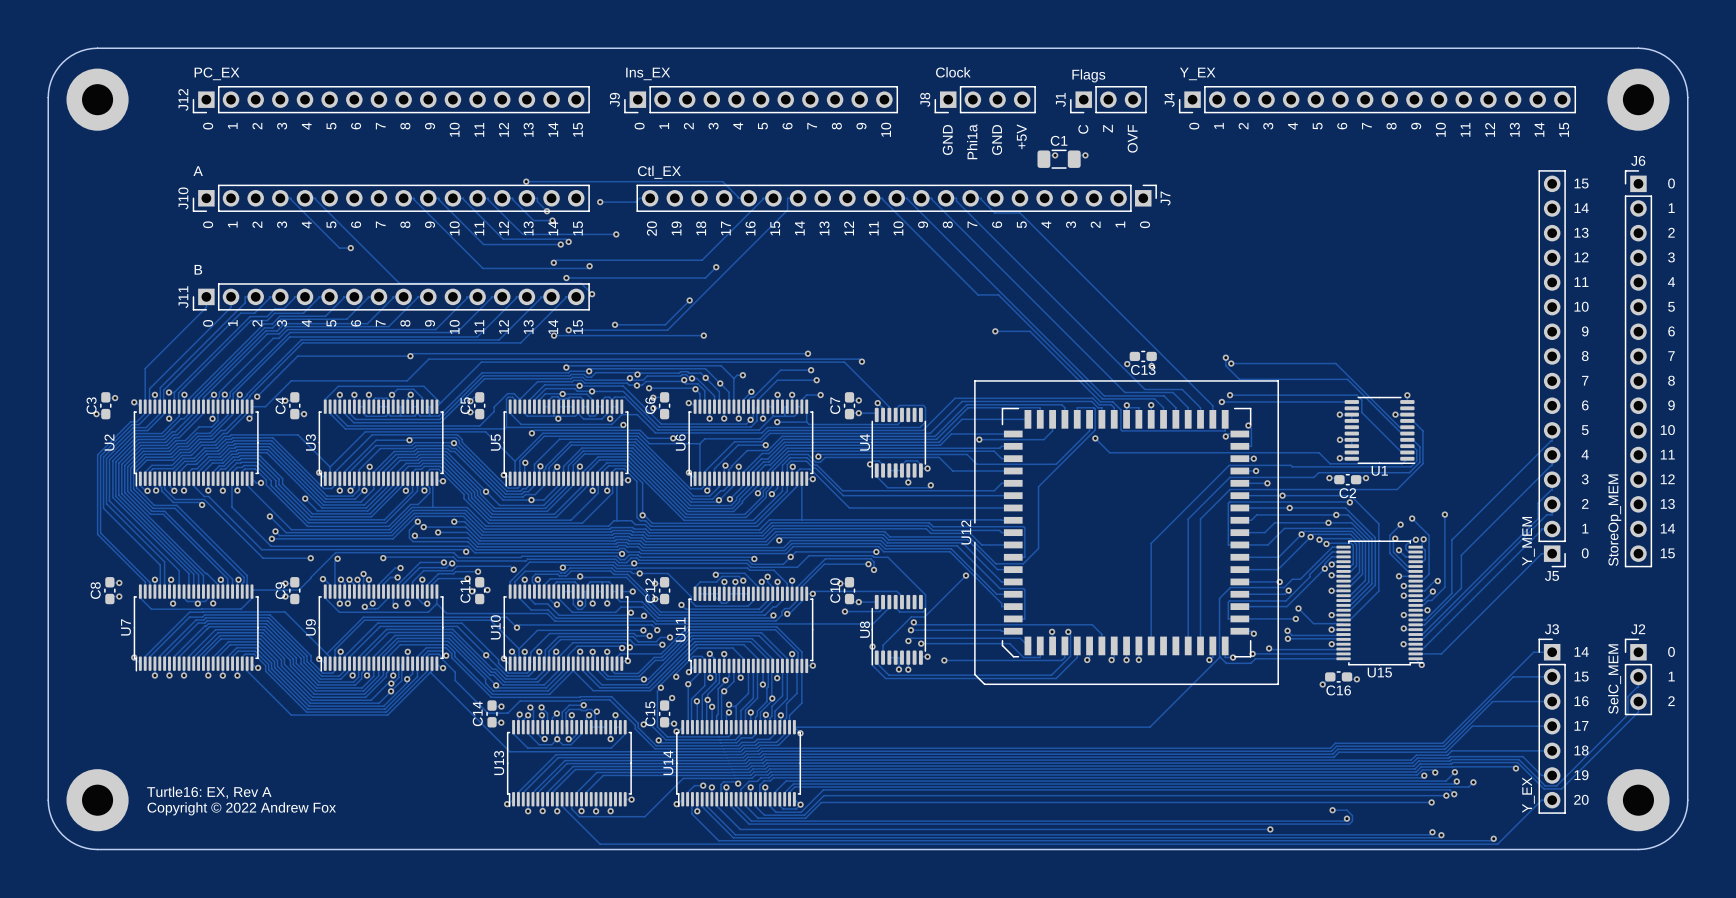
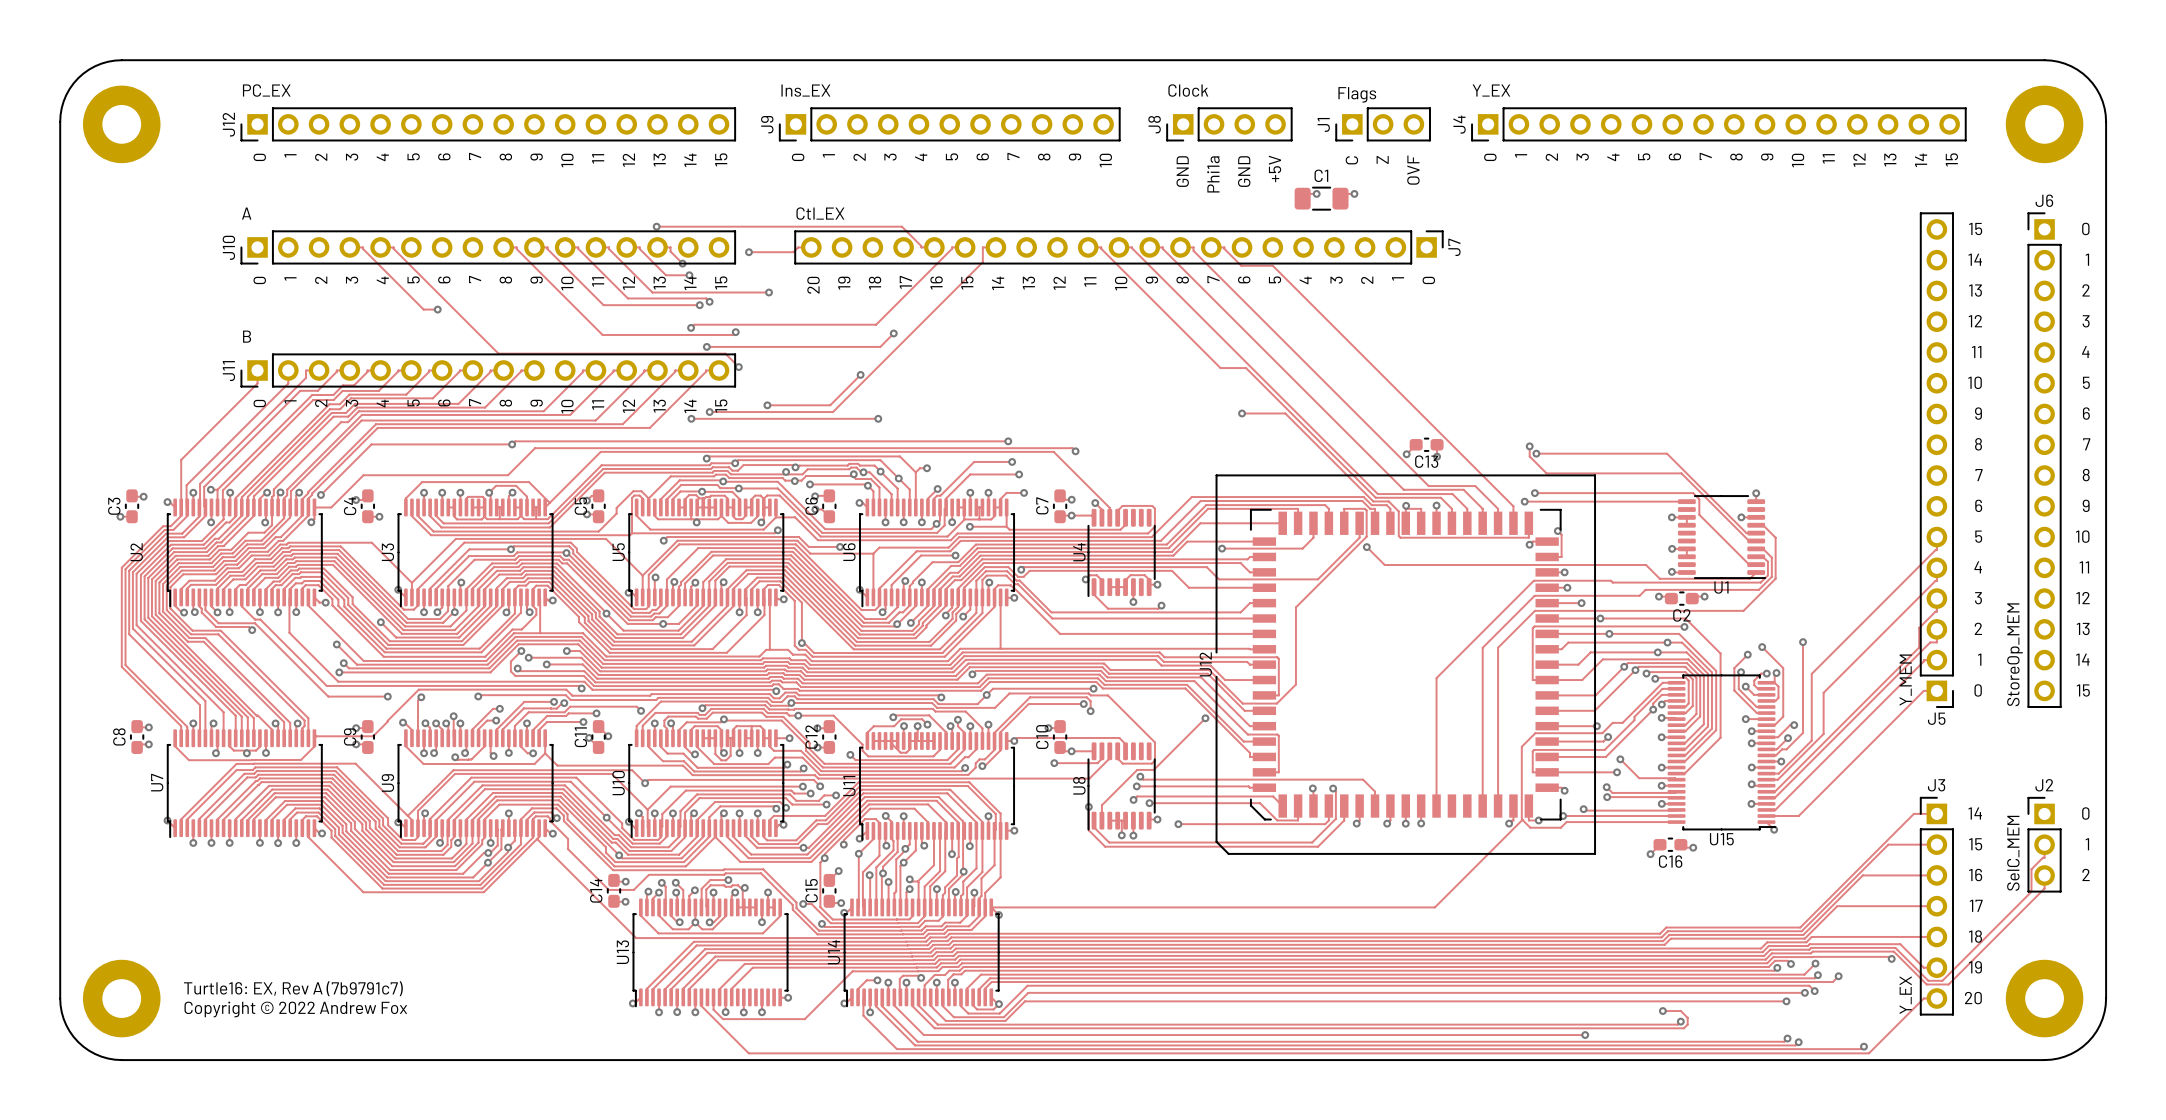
text: Turtle16: EX, Rev A (209, 792) -> Turtle16: EX, Rev A (7b9791c7) (293, 988)

